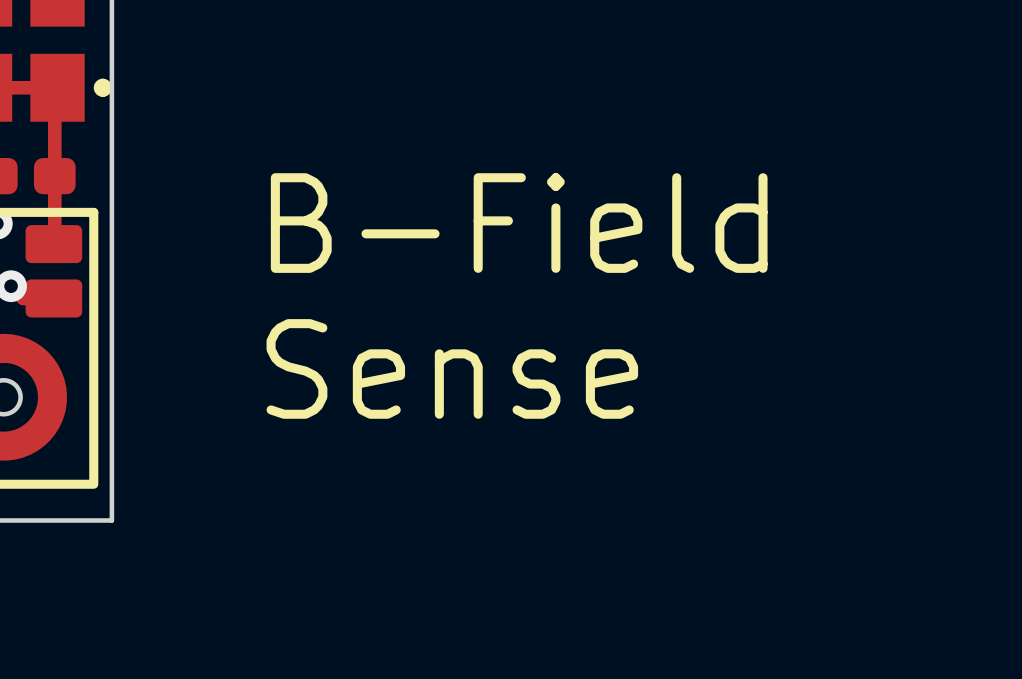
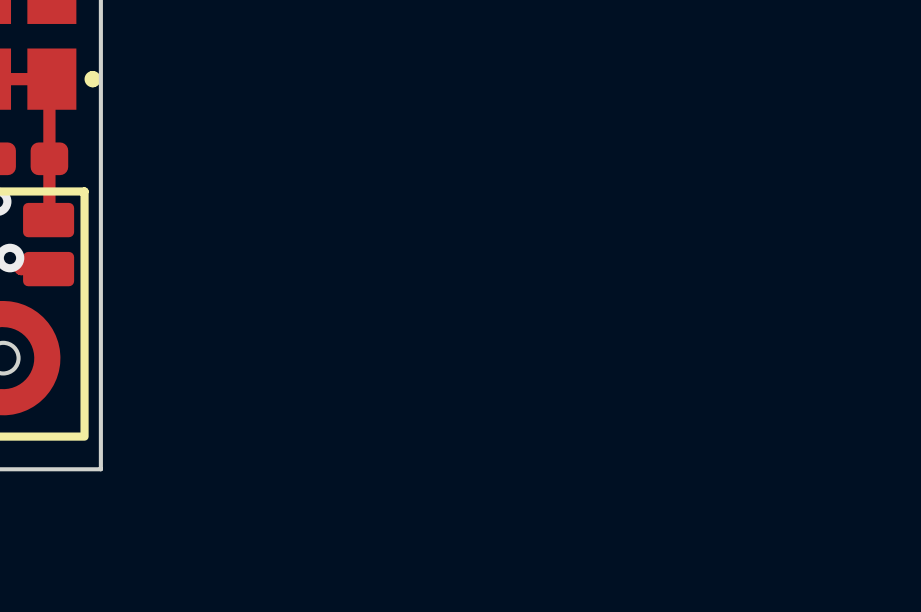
text: B-Field (519, 223) -> none
text: Sense (452, 368) -> none

